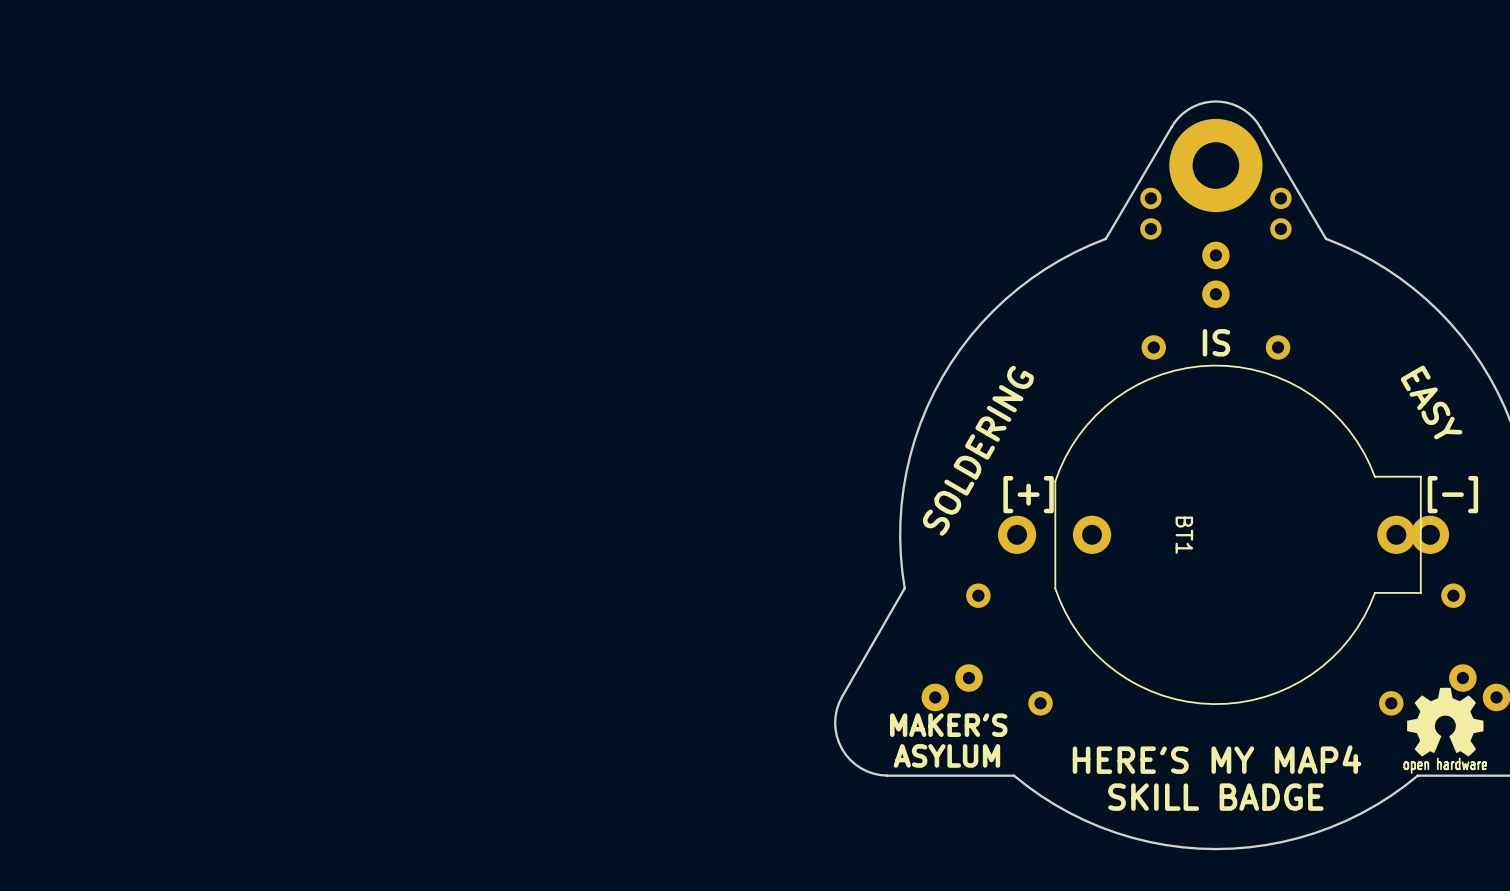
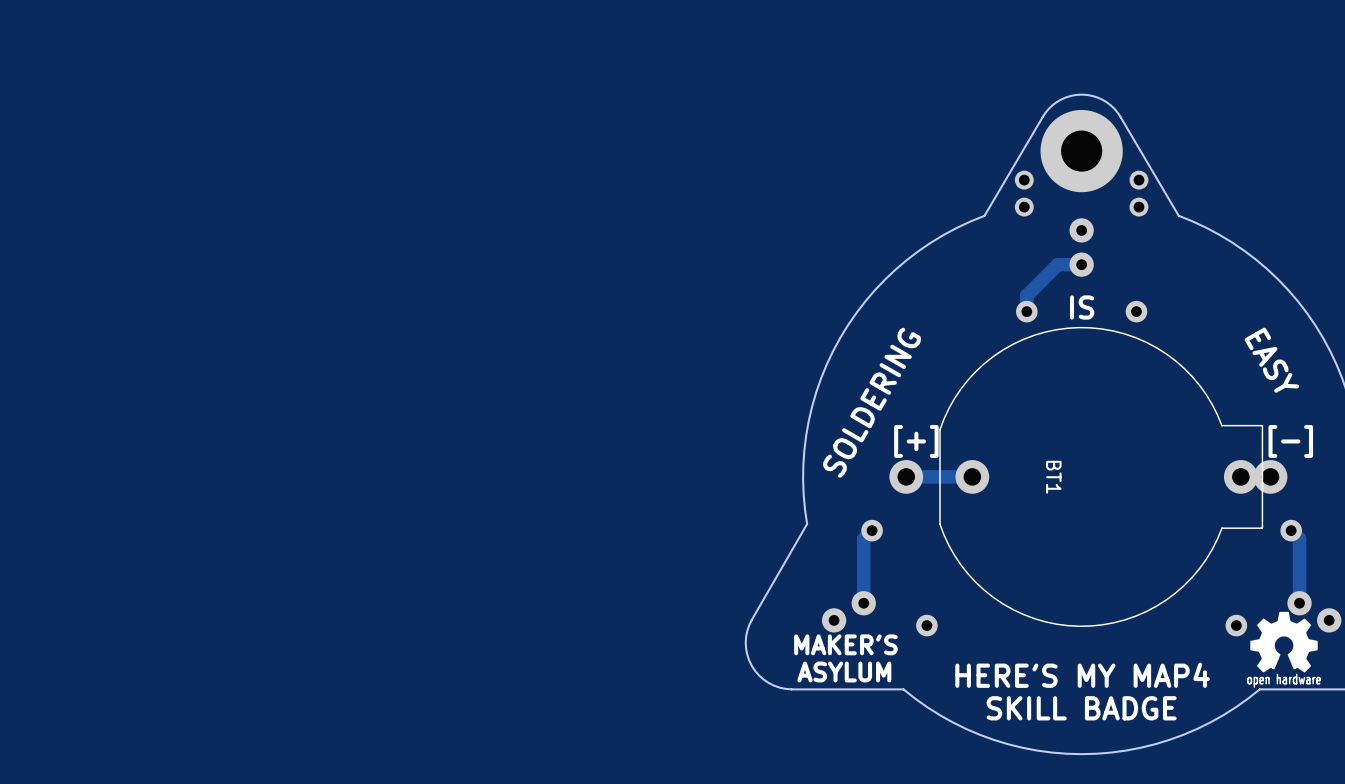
track: none -> (1081, 264) (1057, 264) (1026, 295) (1026, 311)
track: none -> (972, 476) (906, 476)
track: none -> (872, 530) (863, 538) (863, 603)
track: none -> (1291, 530) (1299, 538) (1299, 603)

